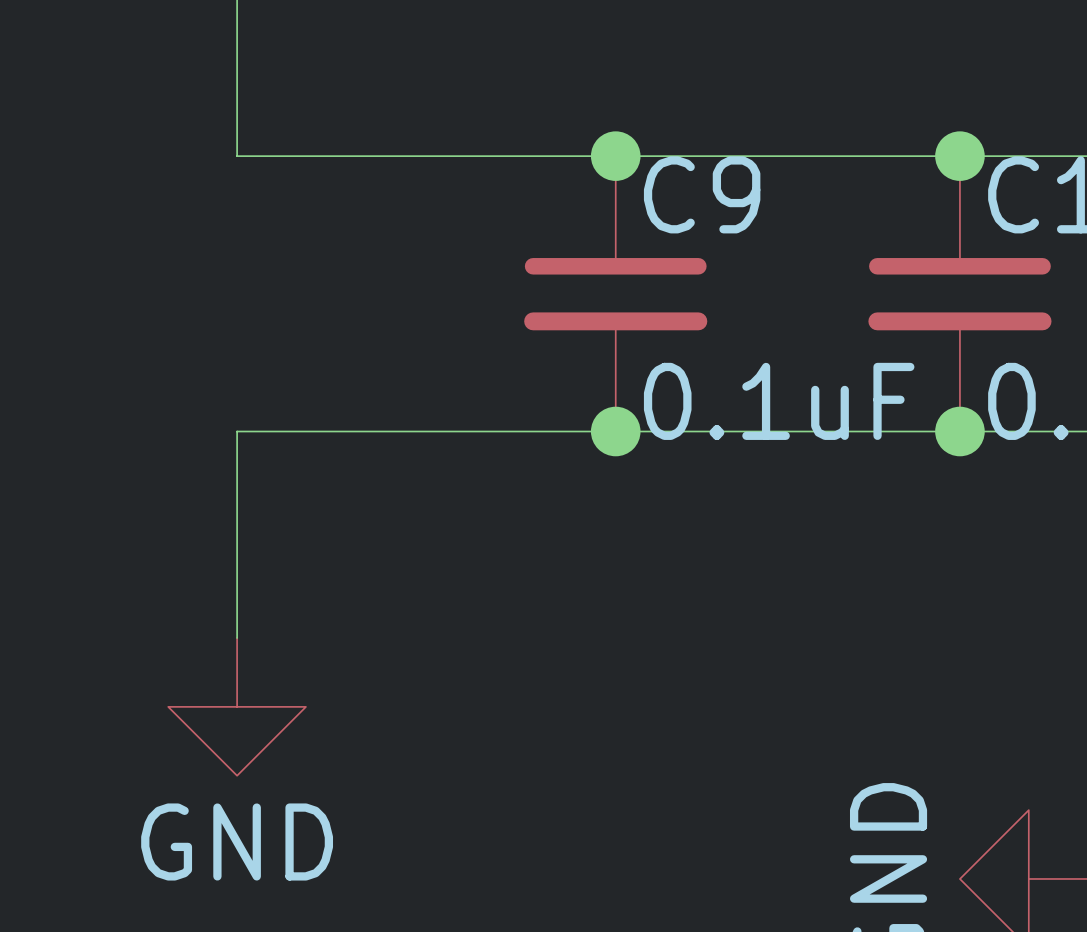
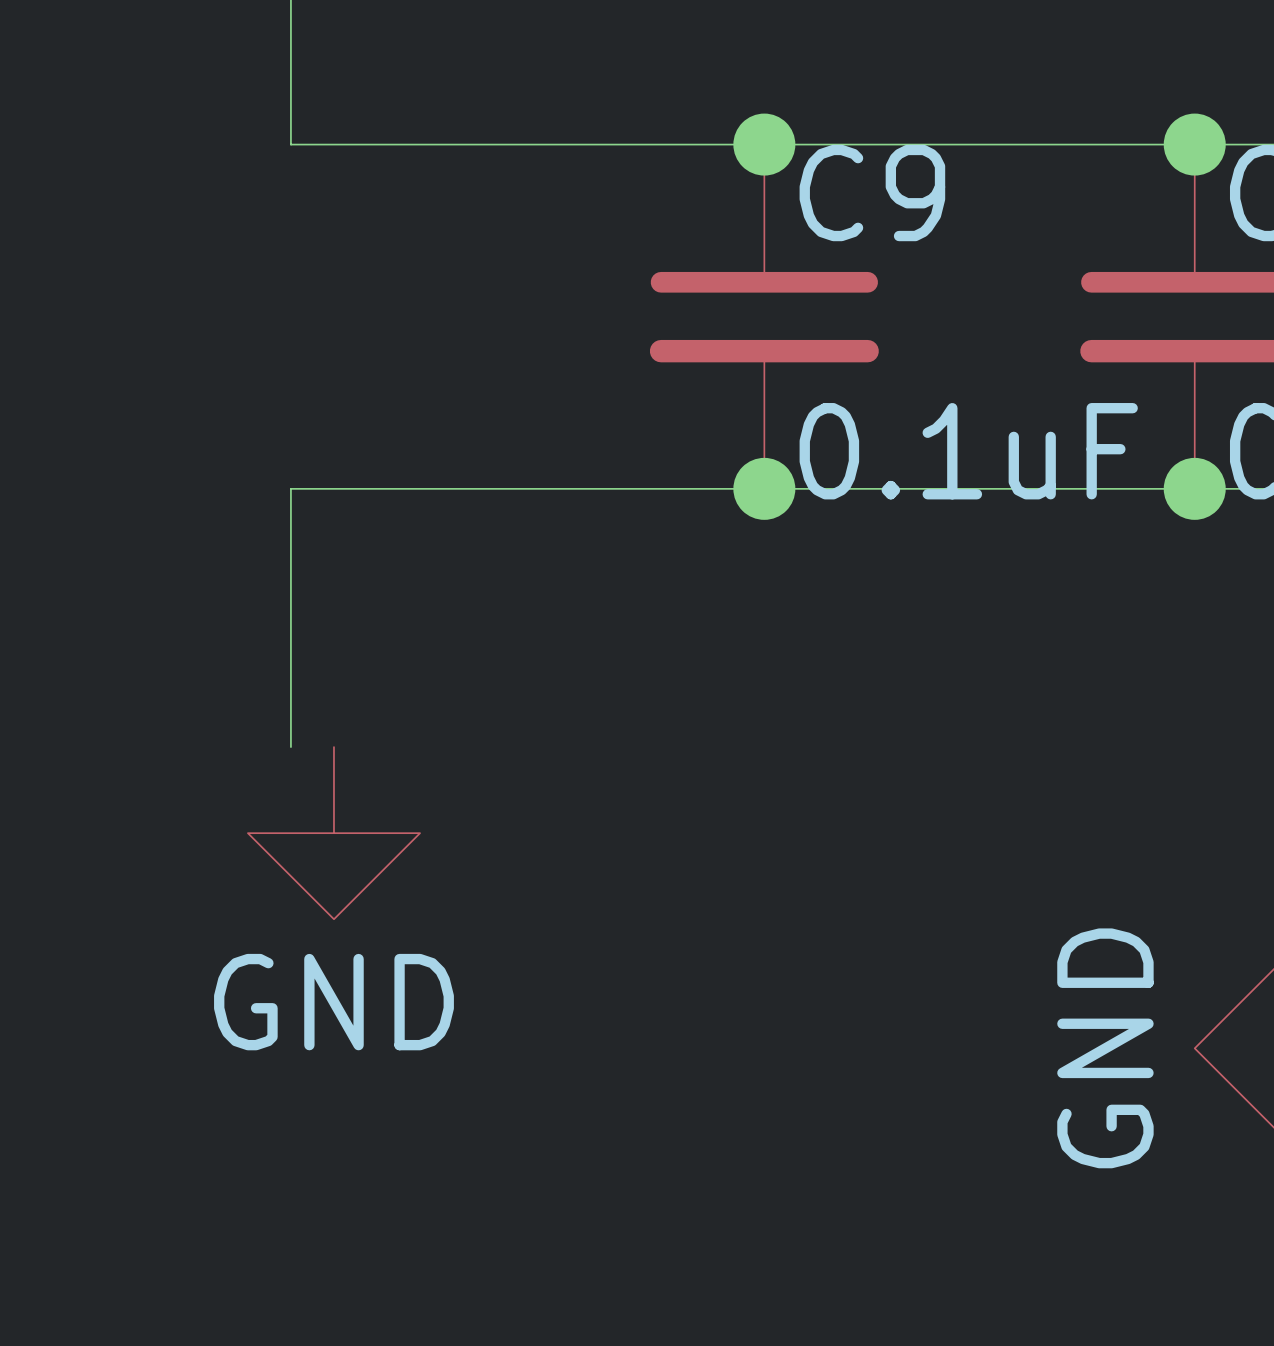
power symbol position: GND (237, 706) -> GND (333, 833)

